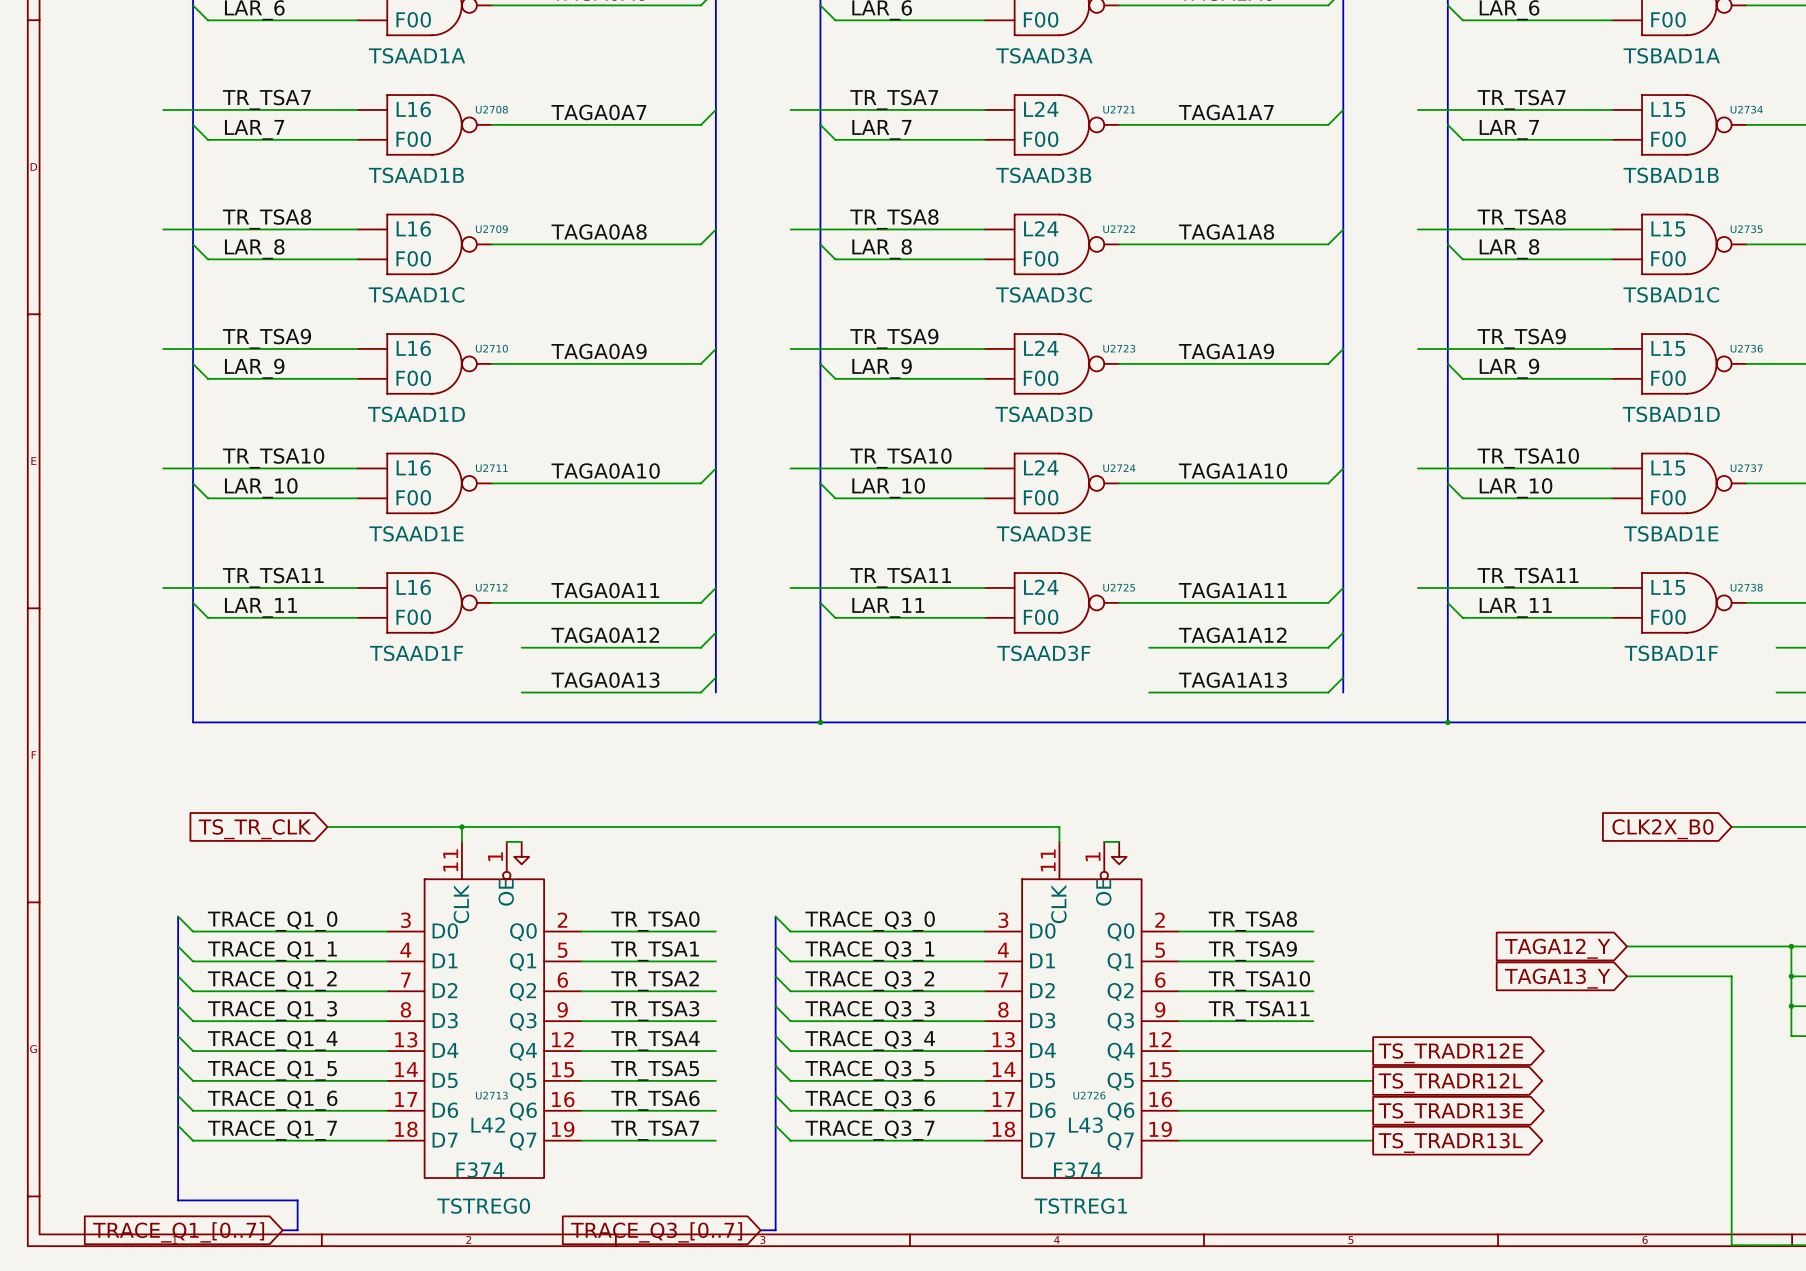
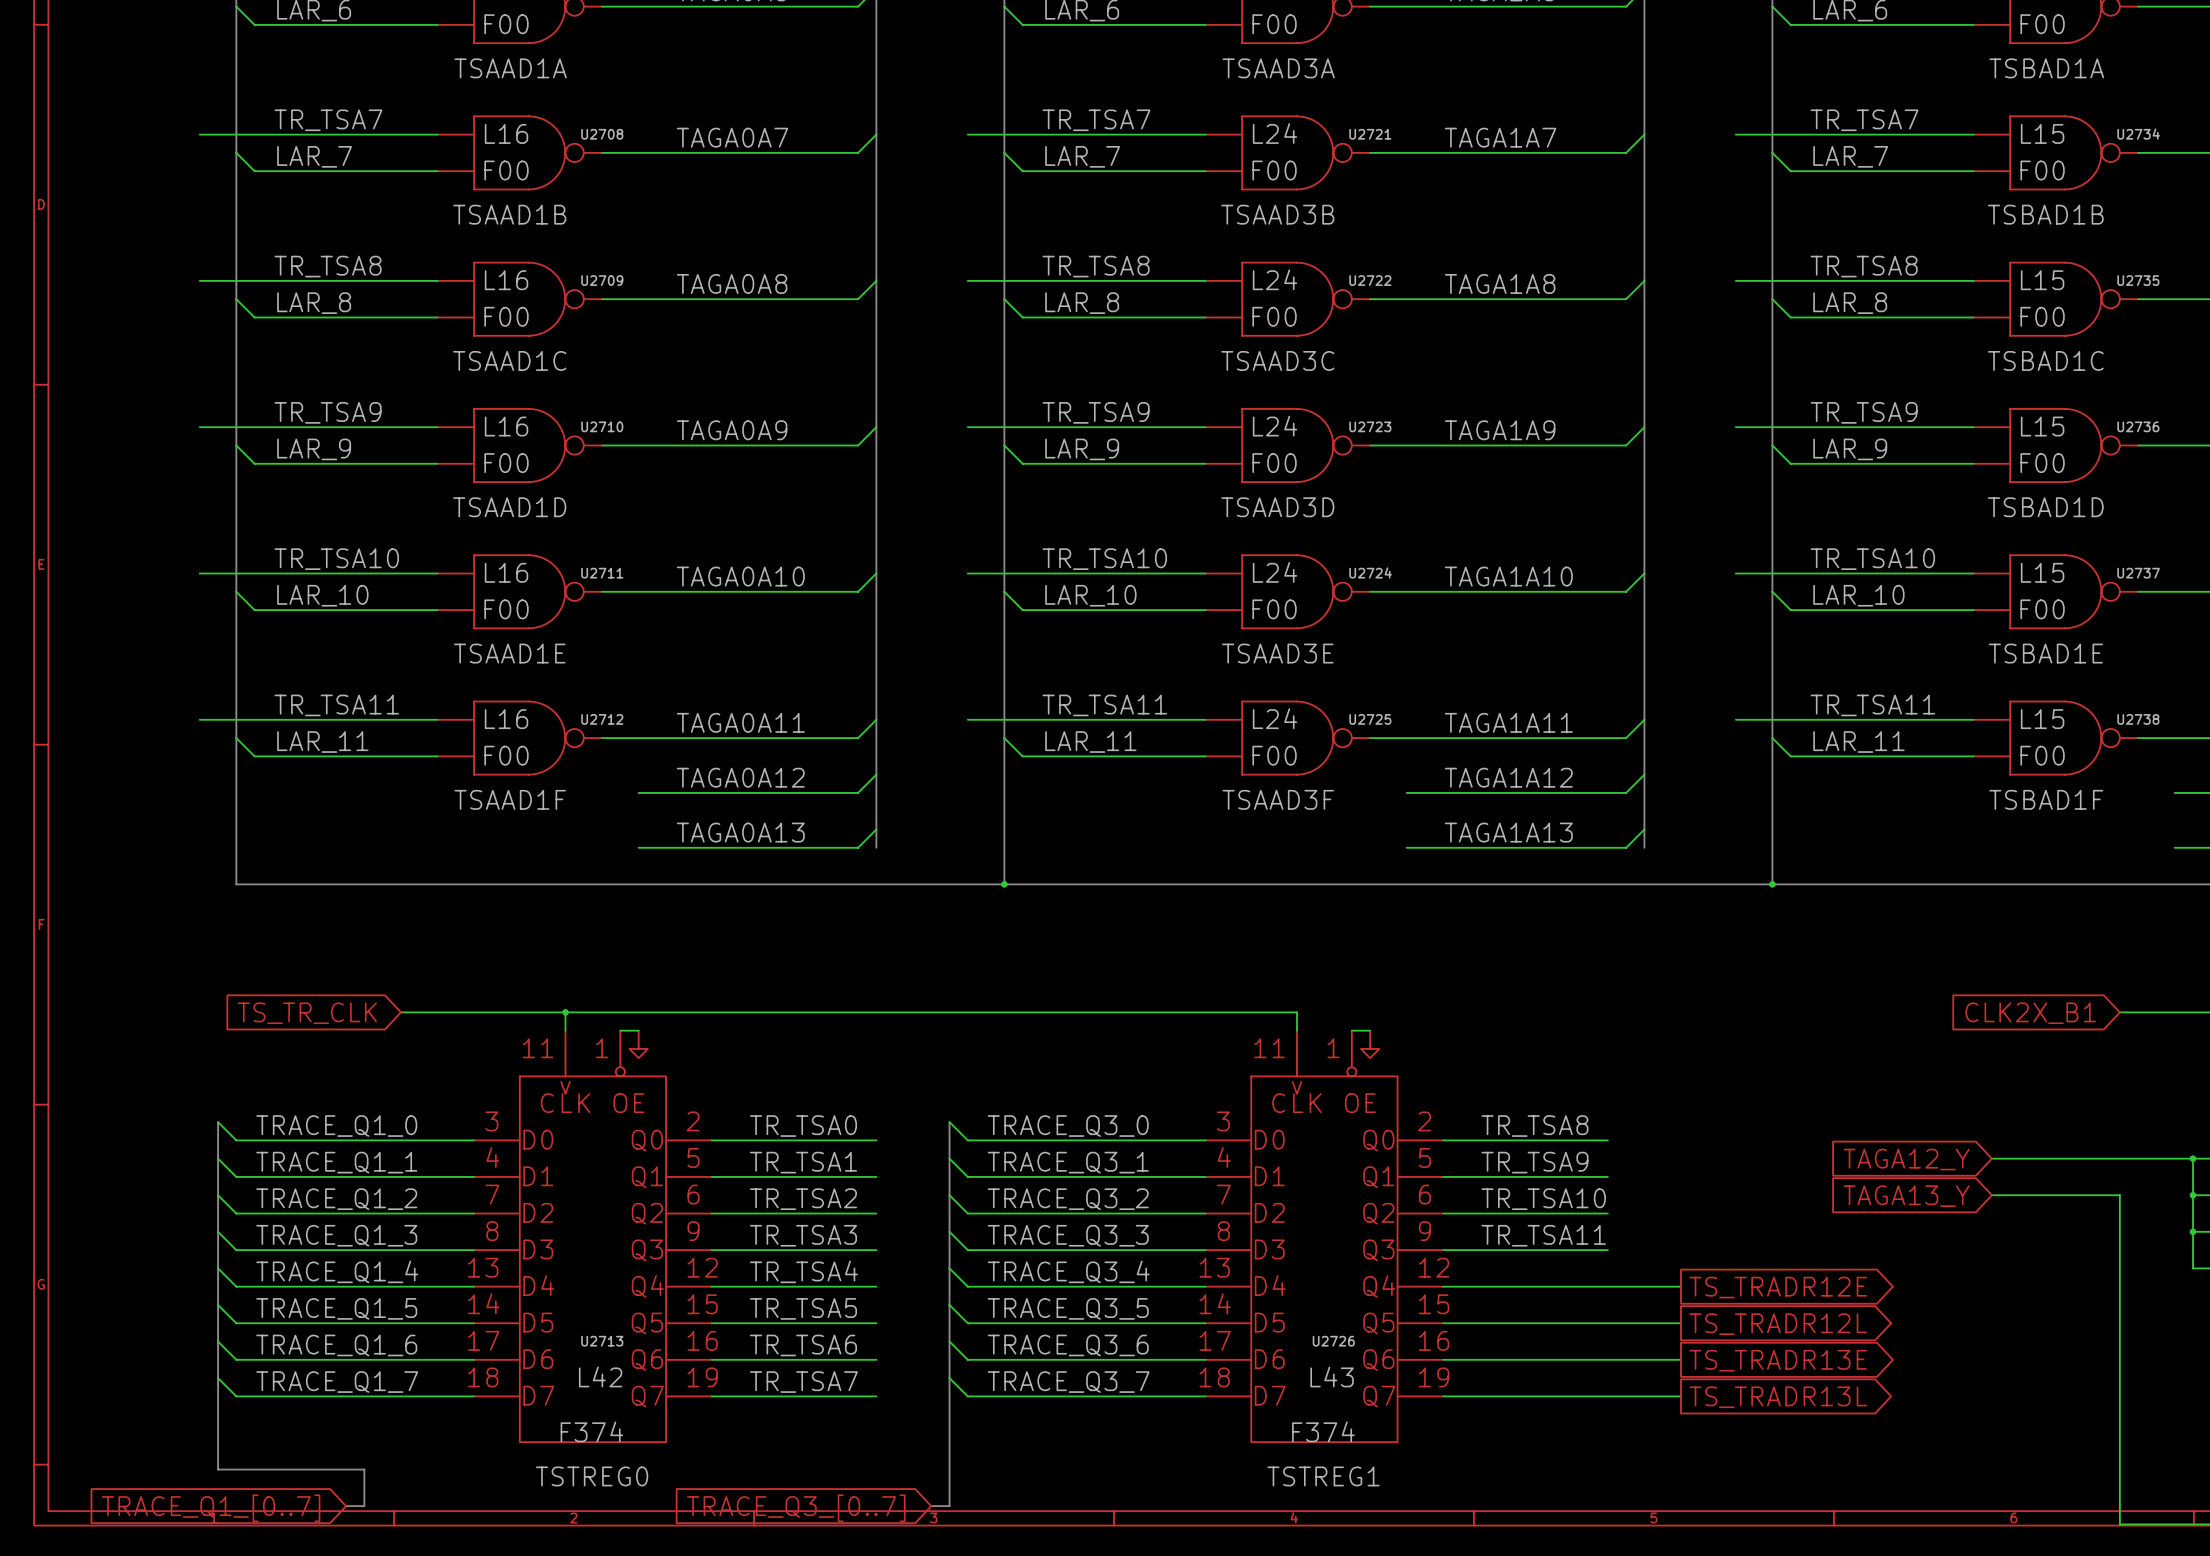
global label: CLK2X_B0 (1662, 829) -> CLK2X_B1 (2030, 1013)
U2713 symbol: [387, 841, 582, 1179] -> [474, 1030, 712, 1443]
U2726 symbol: [984, 841, 1179, 1179] -> [1205, 1030, 1444, 1443]

